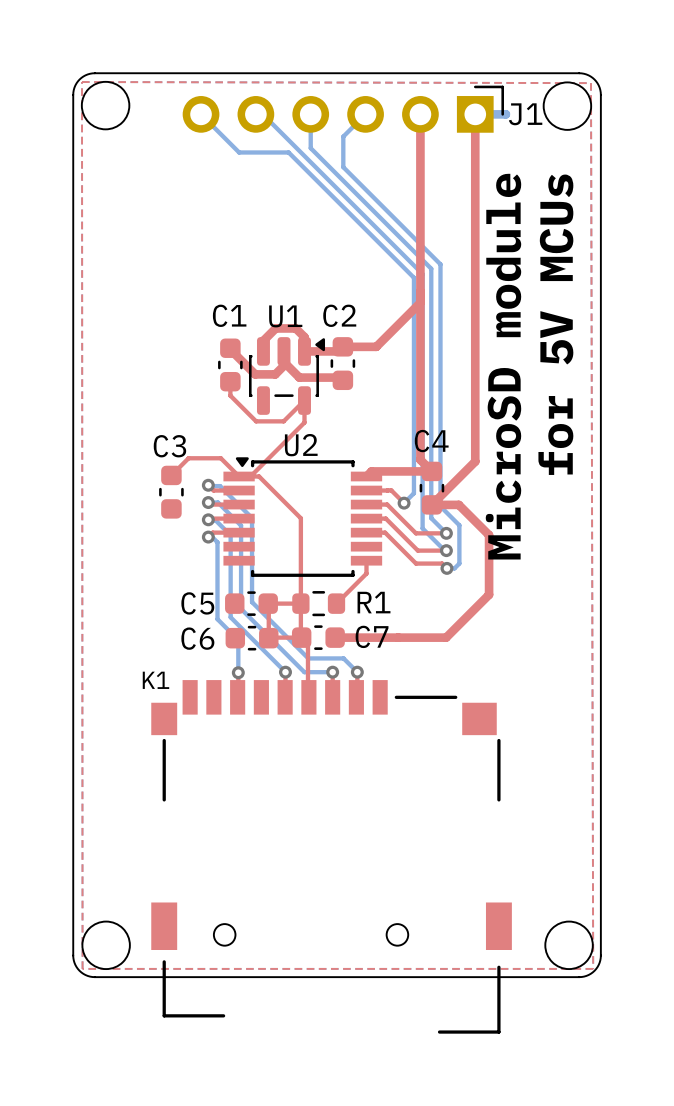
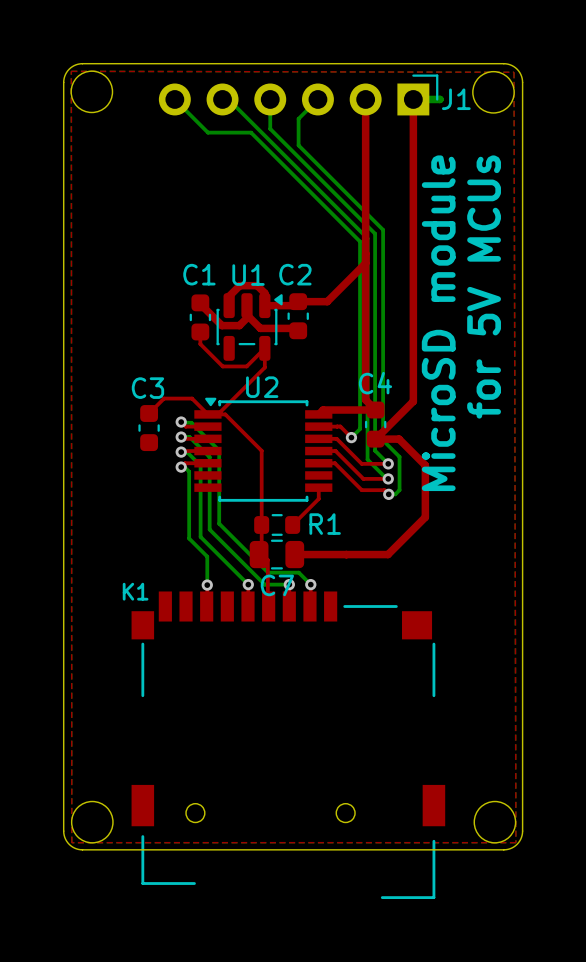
C5: (251, 603) -> none
top track: (300, 603) (268, 603) (268, 638) (301, 637) -> none
C7 footprint: [291, 625, 345, 650] -> [249, 539, 305, 570]
C7 name position: C7 (372, 636) -> C7 (277, 585)
C6: (252, 638) -> none

